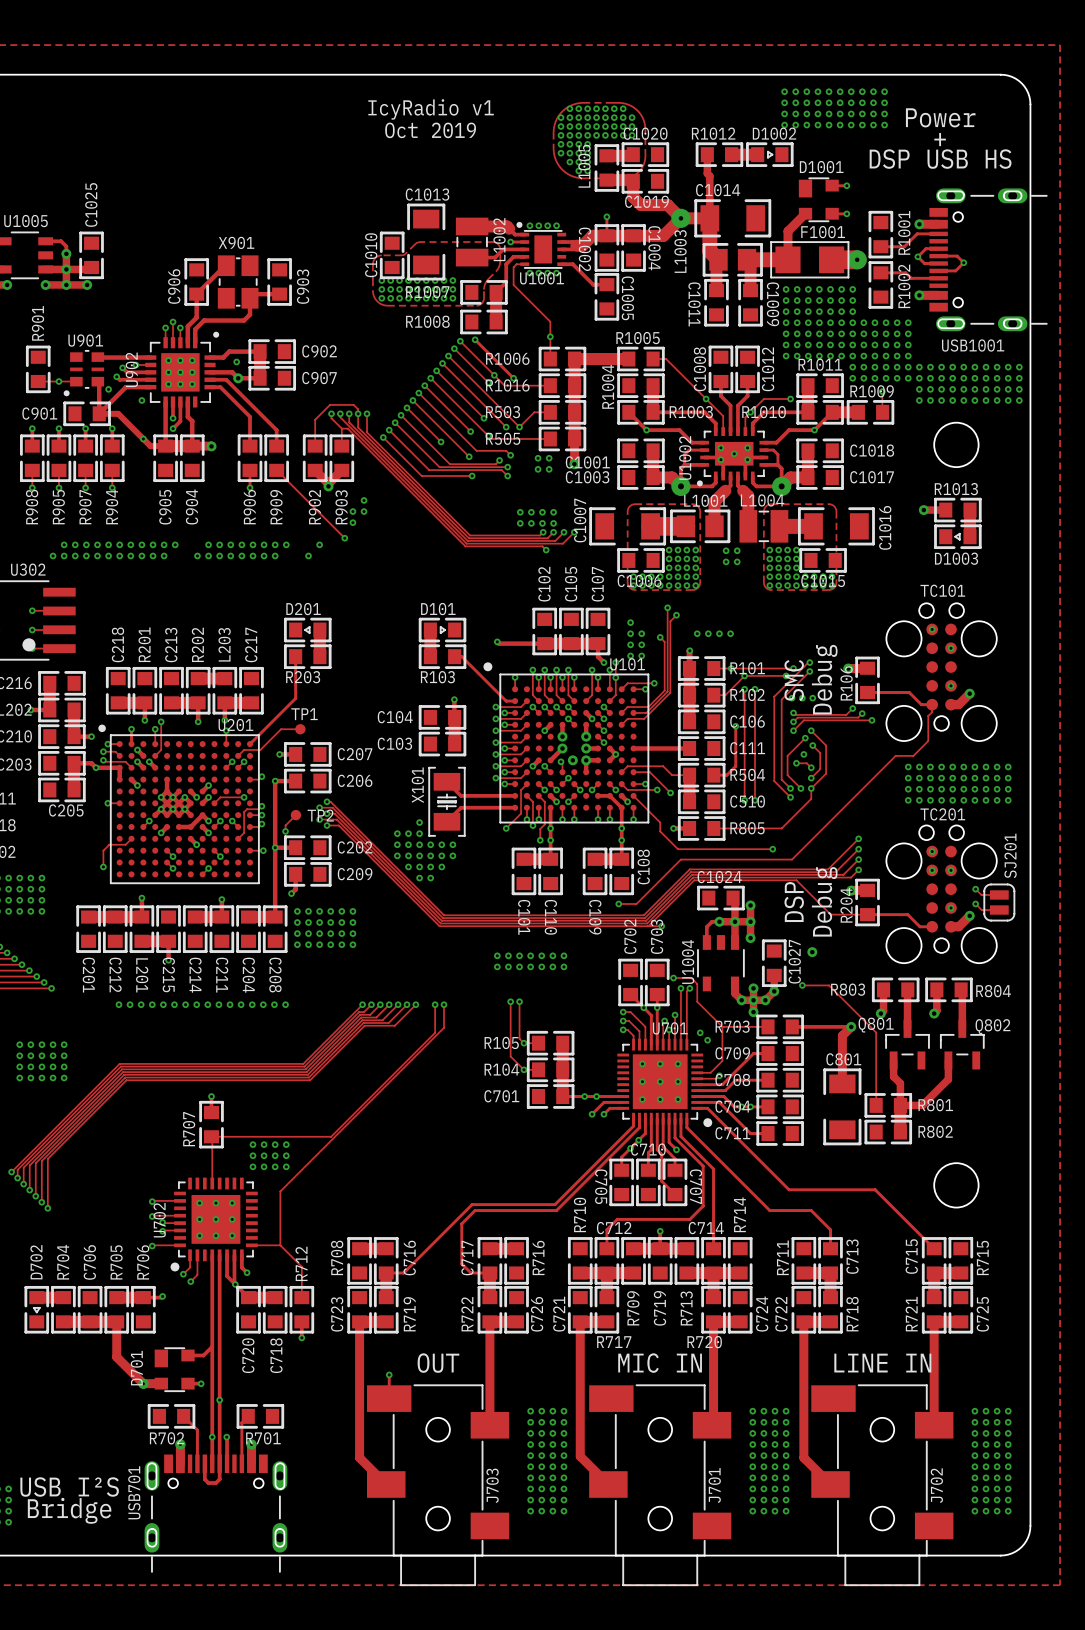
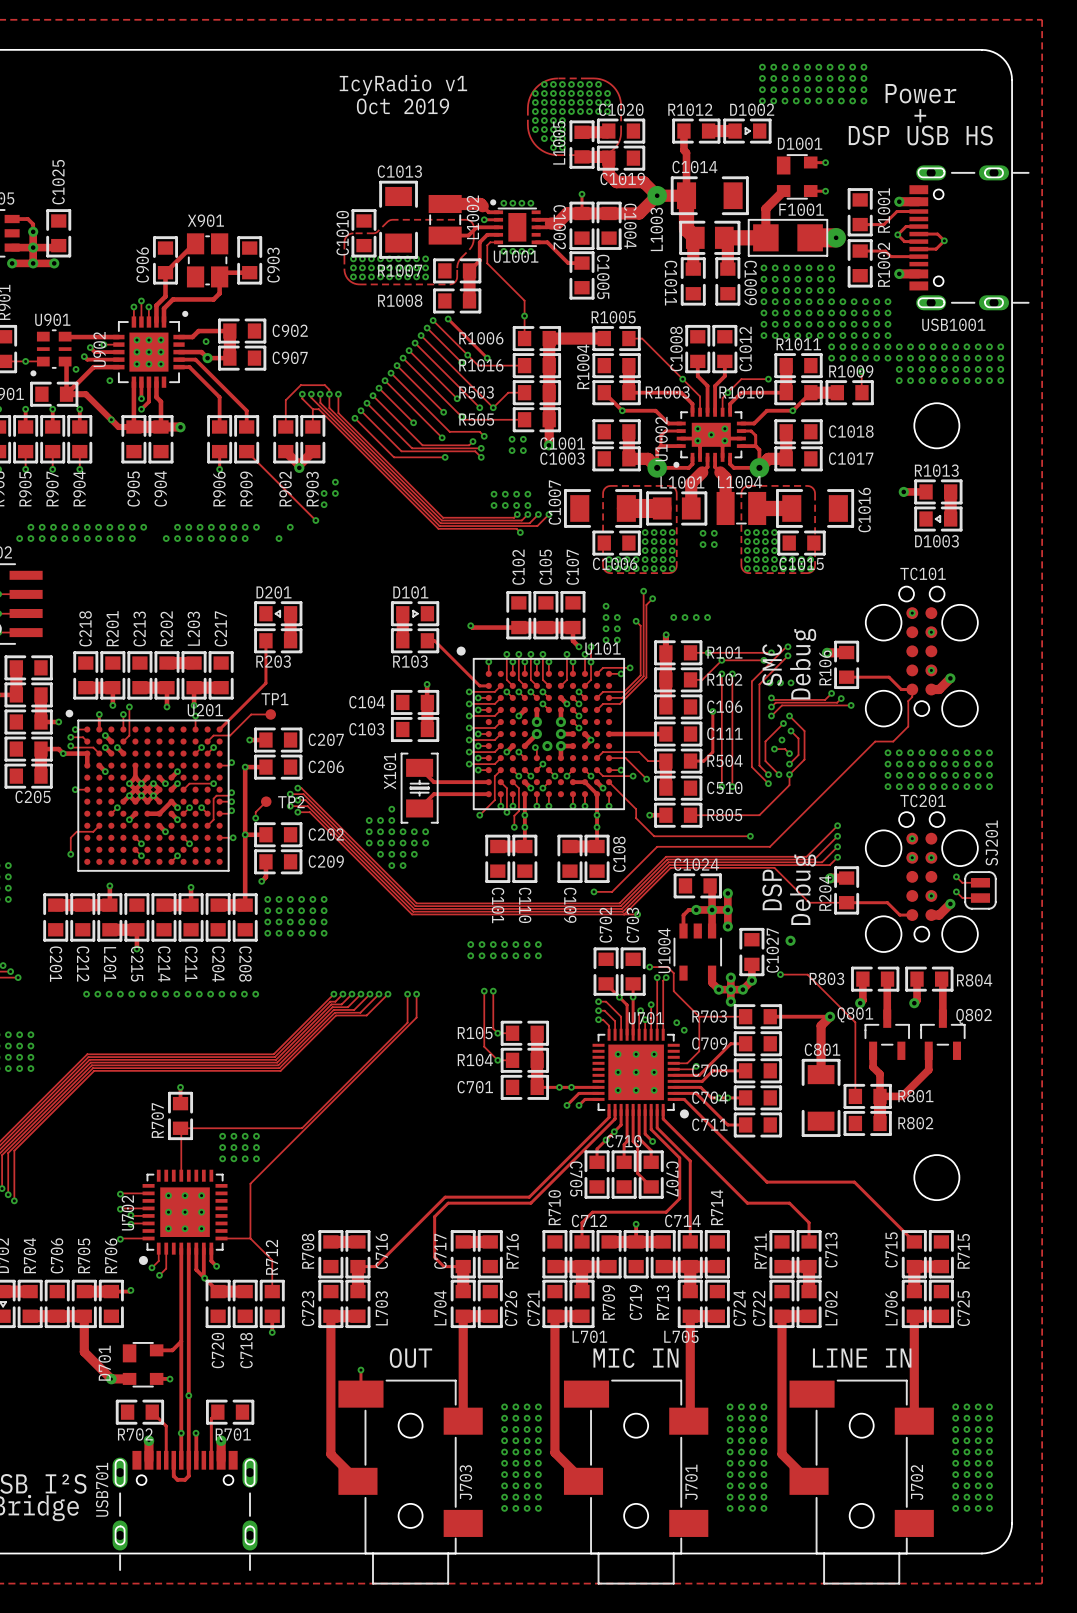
R719 name: R719 (409, 1314) -> L703 (381, 1308)
R722 name: R722 (467, 1314) -> L704 (440, 1308)
R718 name: R718 (852, 1314) -> L702 (831, 1308)
R721 name: R721 (911, 1314) -> L706 (891, 1308)
R717 name: R717 (614, 1342) -> L701 (589, 1336)
R720 name: R720 (704, 1342) -> L705 (681, 1336)

